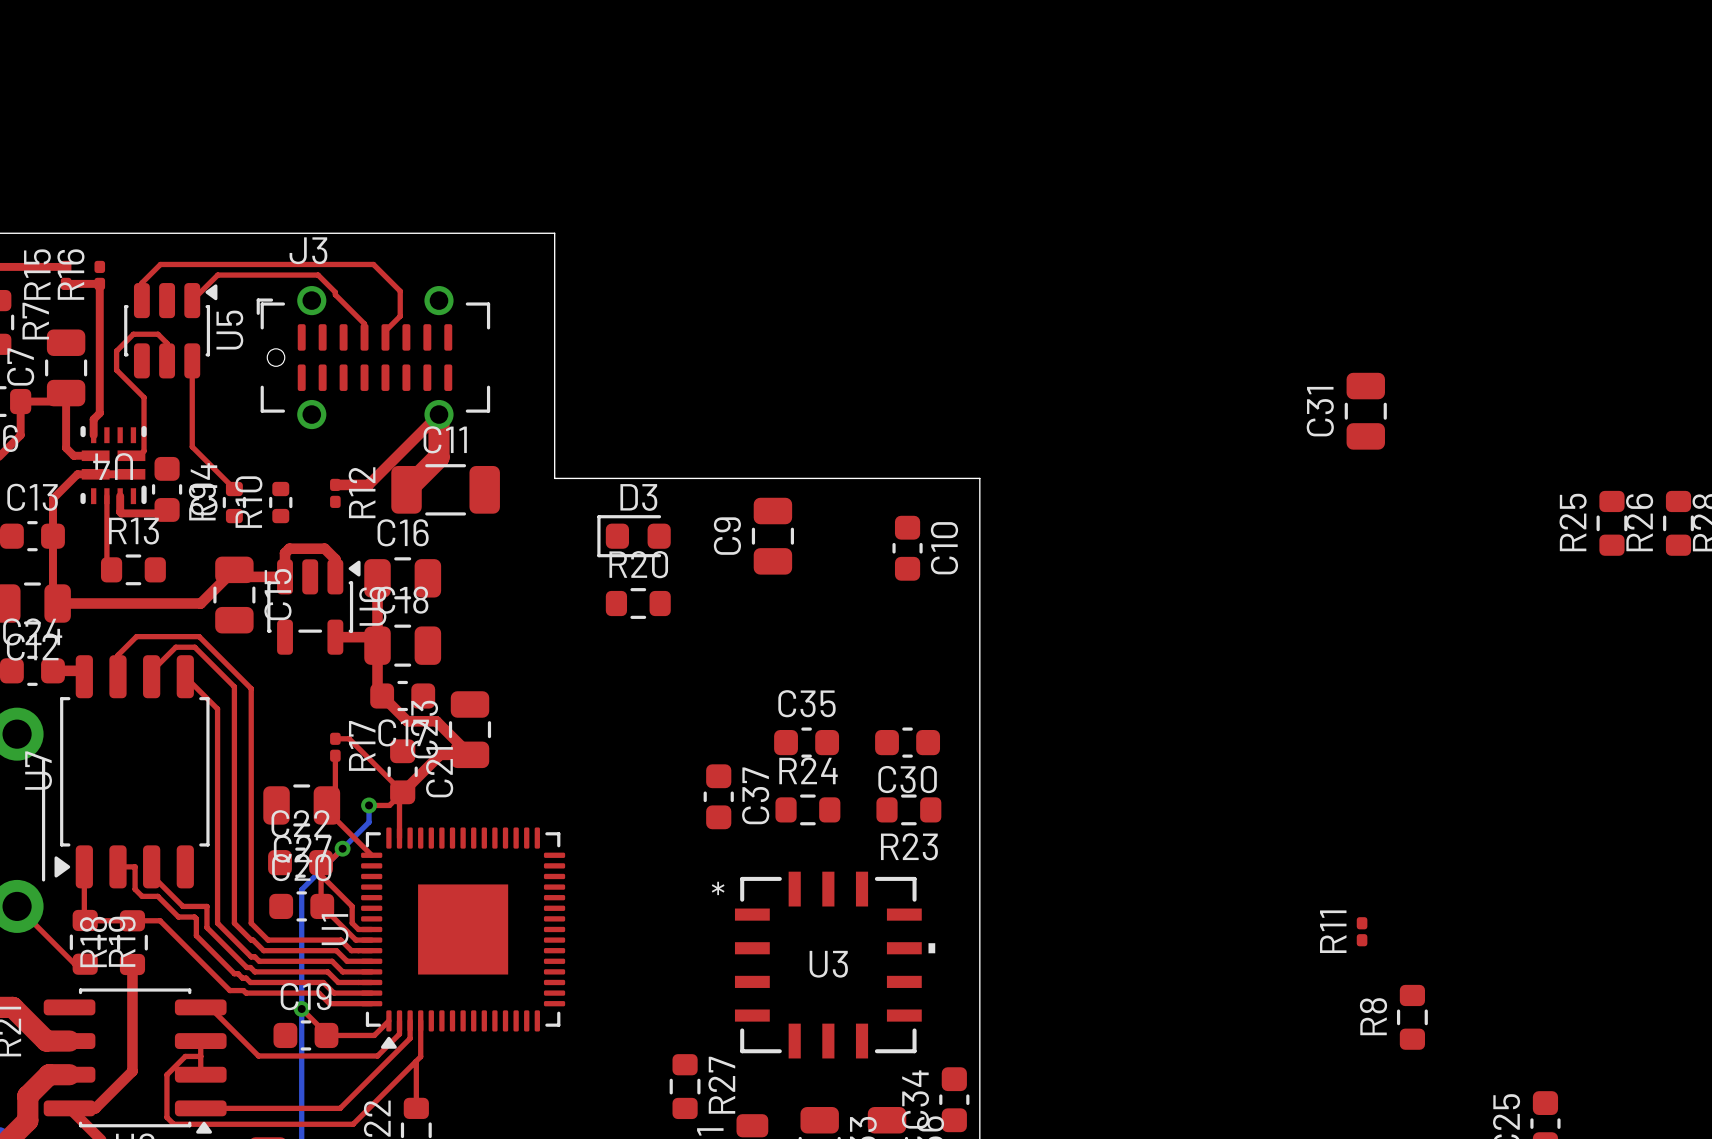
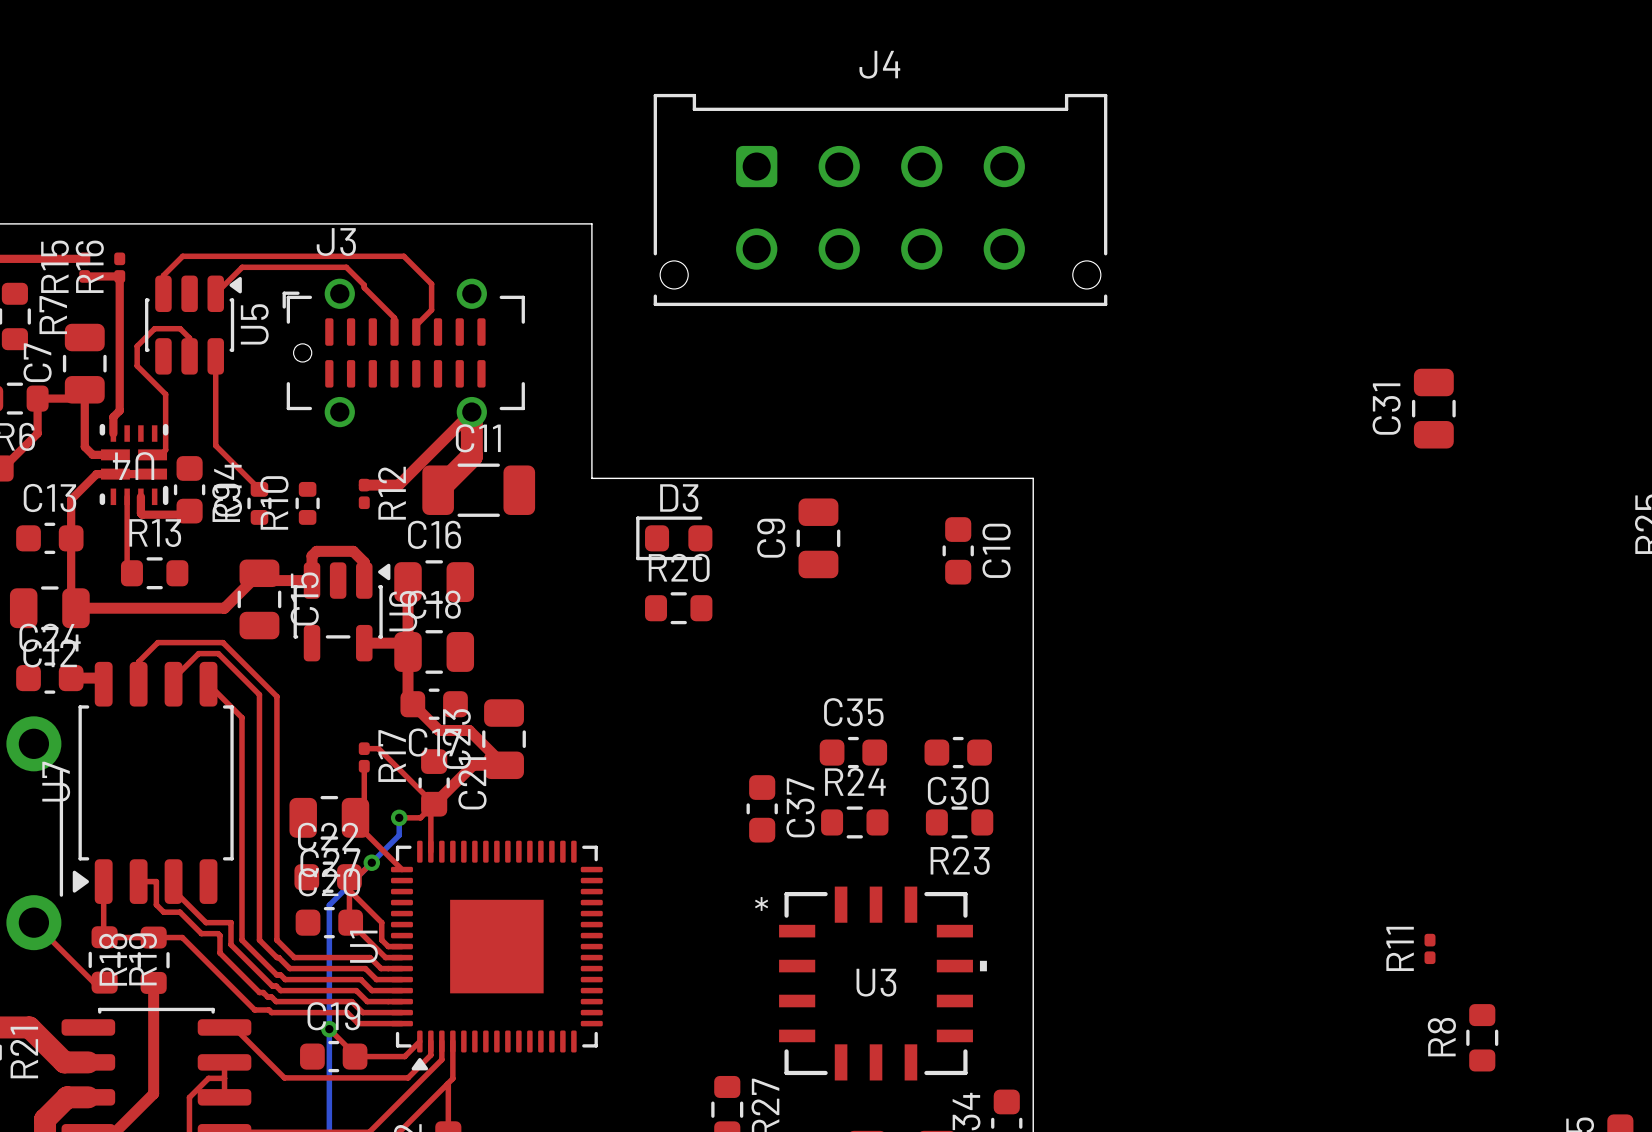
J4: none -> (880, 199)

